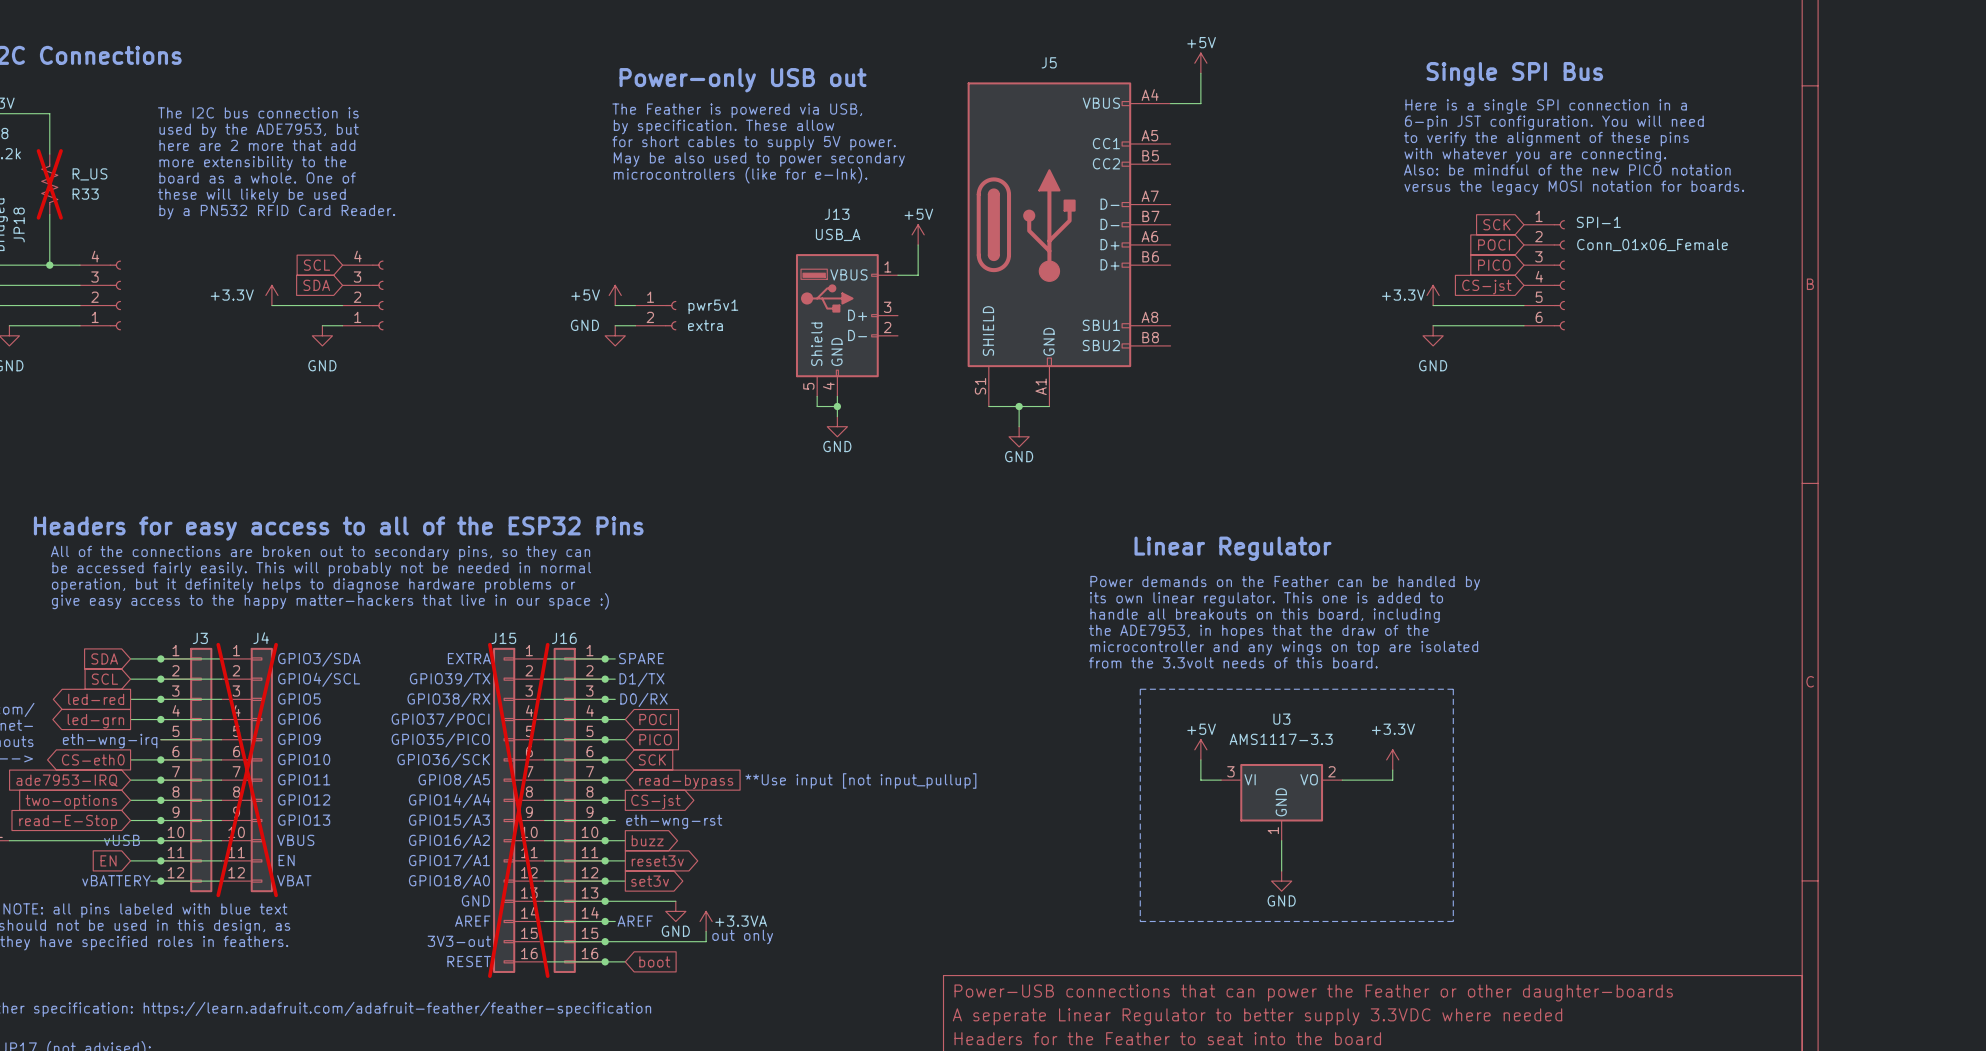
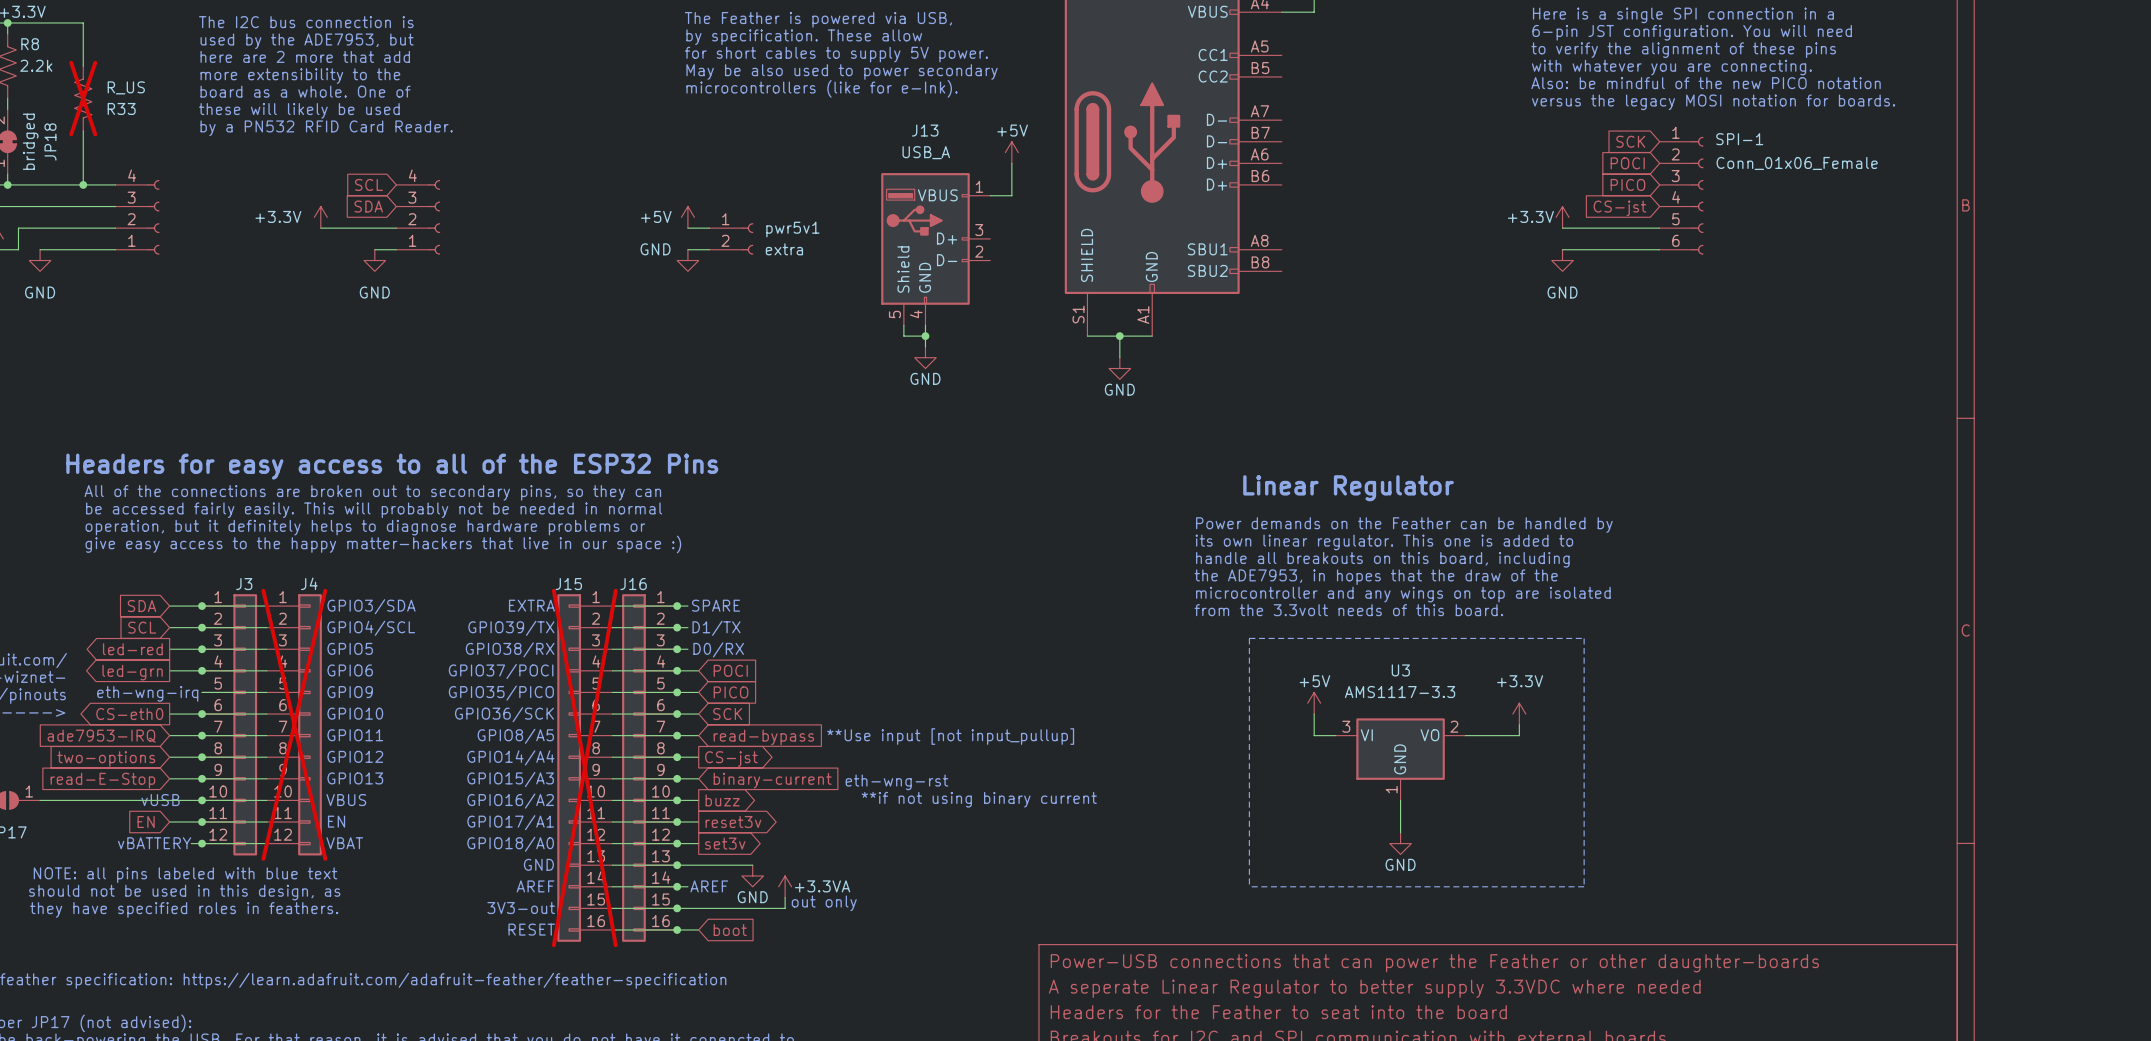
wire: none -> (687, 778) (698, 778)
text position: eth-wng-rst (674, 821) -> eth-wng-rst (896, 782)
global label: none -> binary-current (772, 780)
text: none -> **if not using binary current (979, 799)

